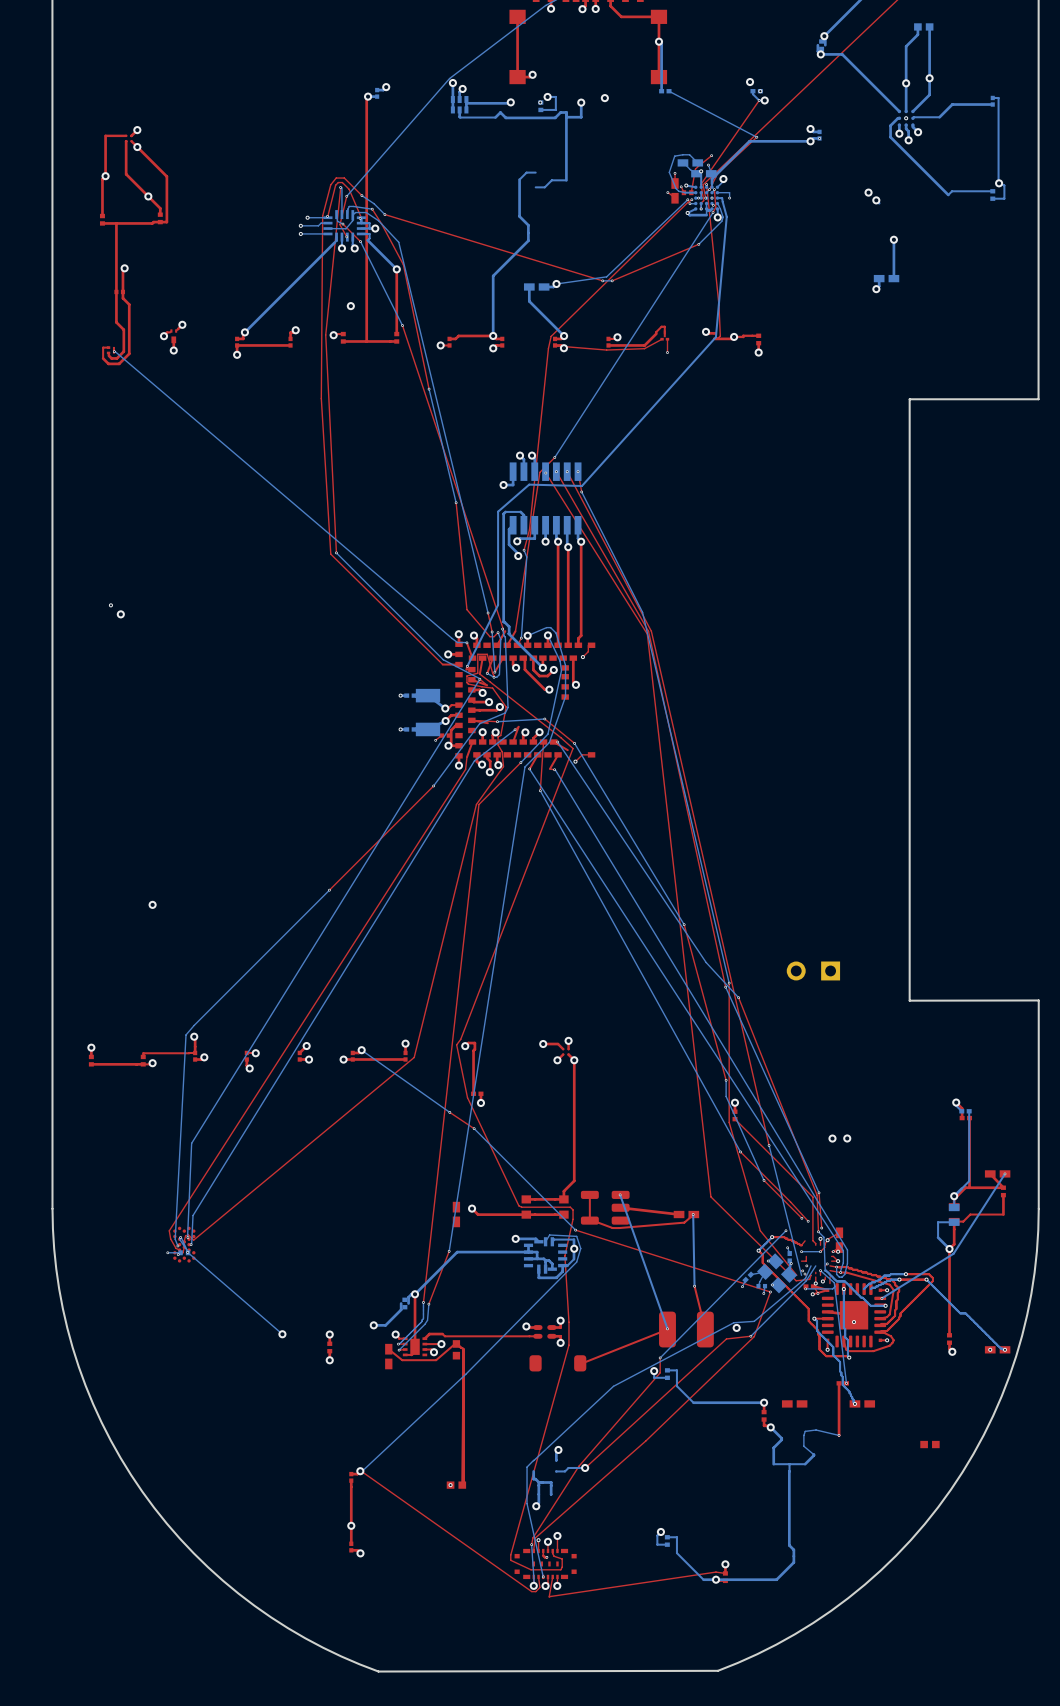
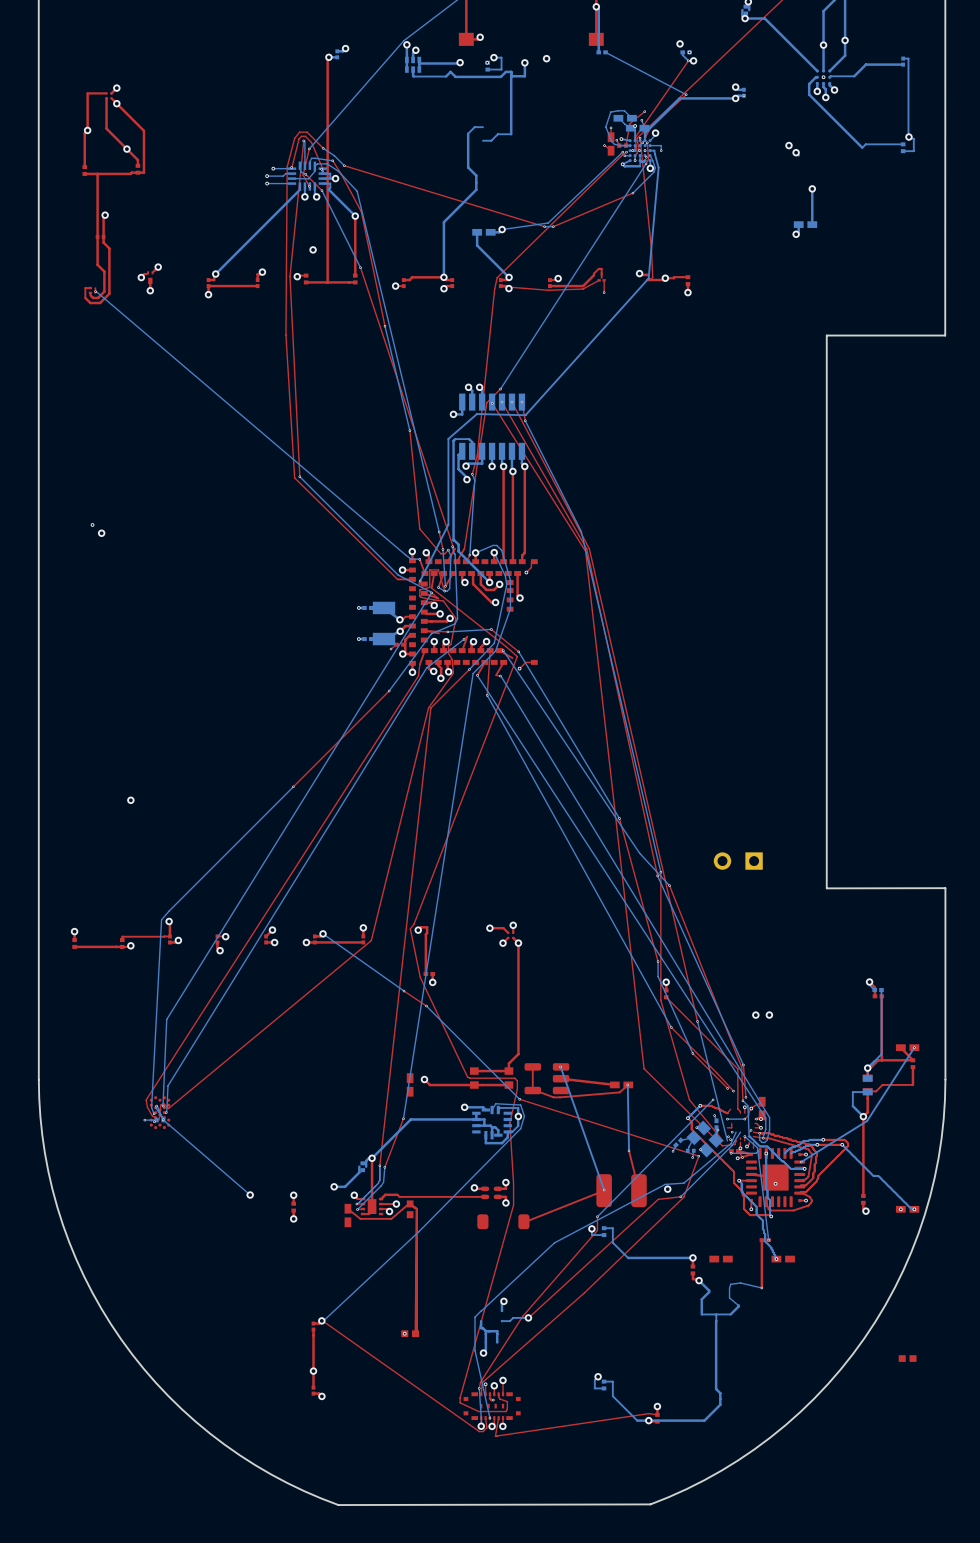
part position: (929, 1444) -> (907, 1358)

